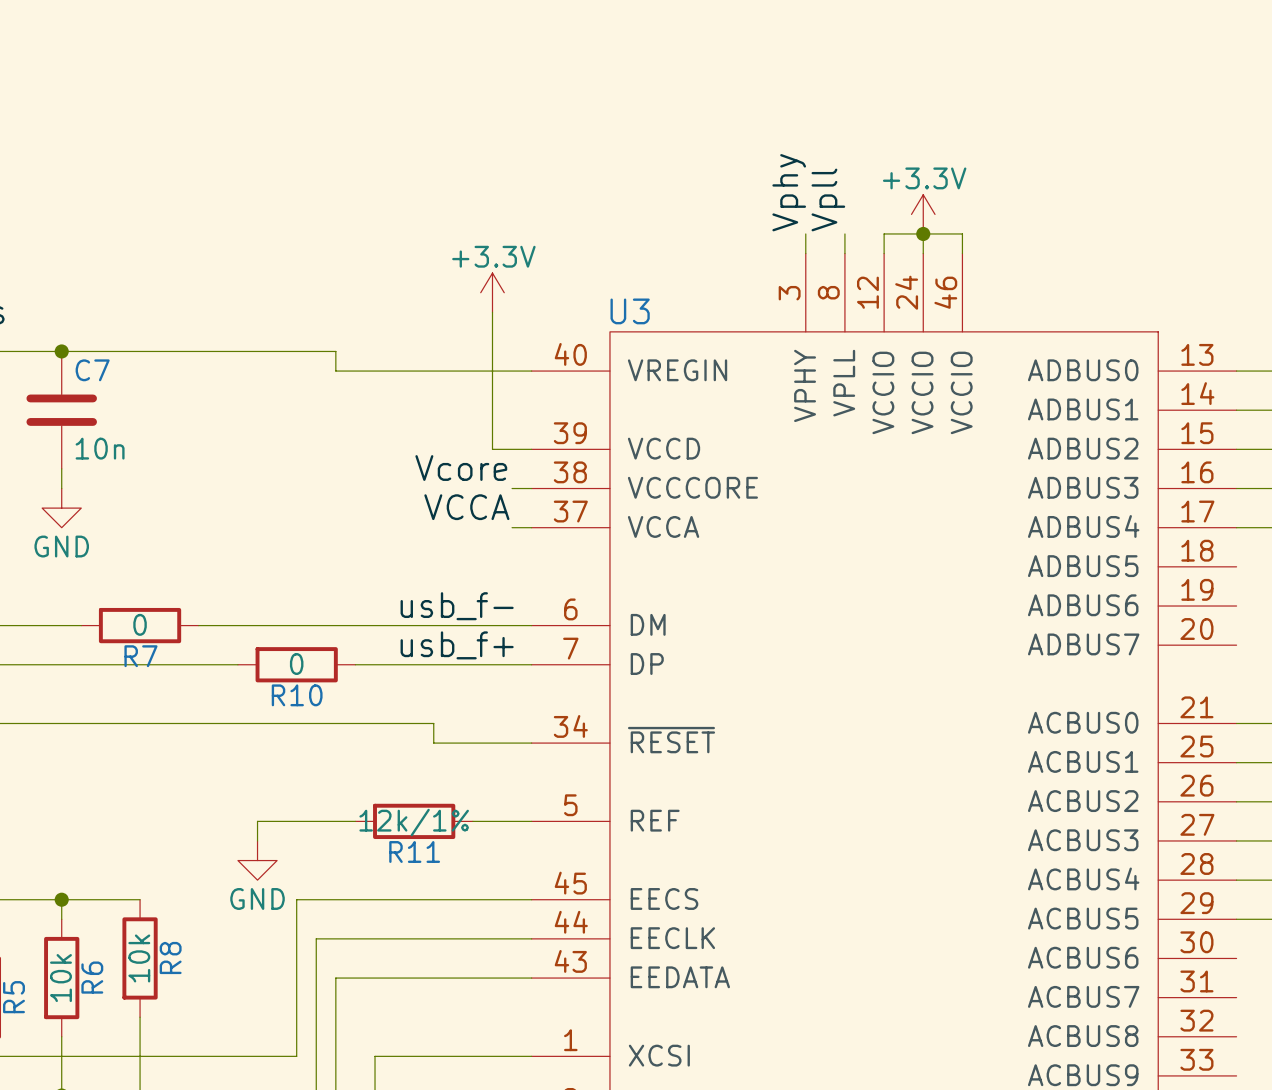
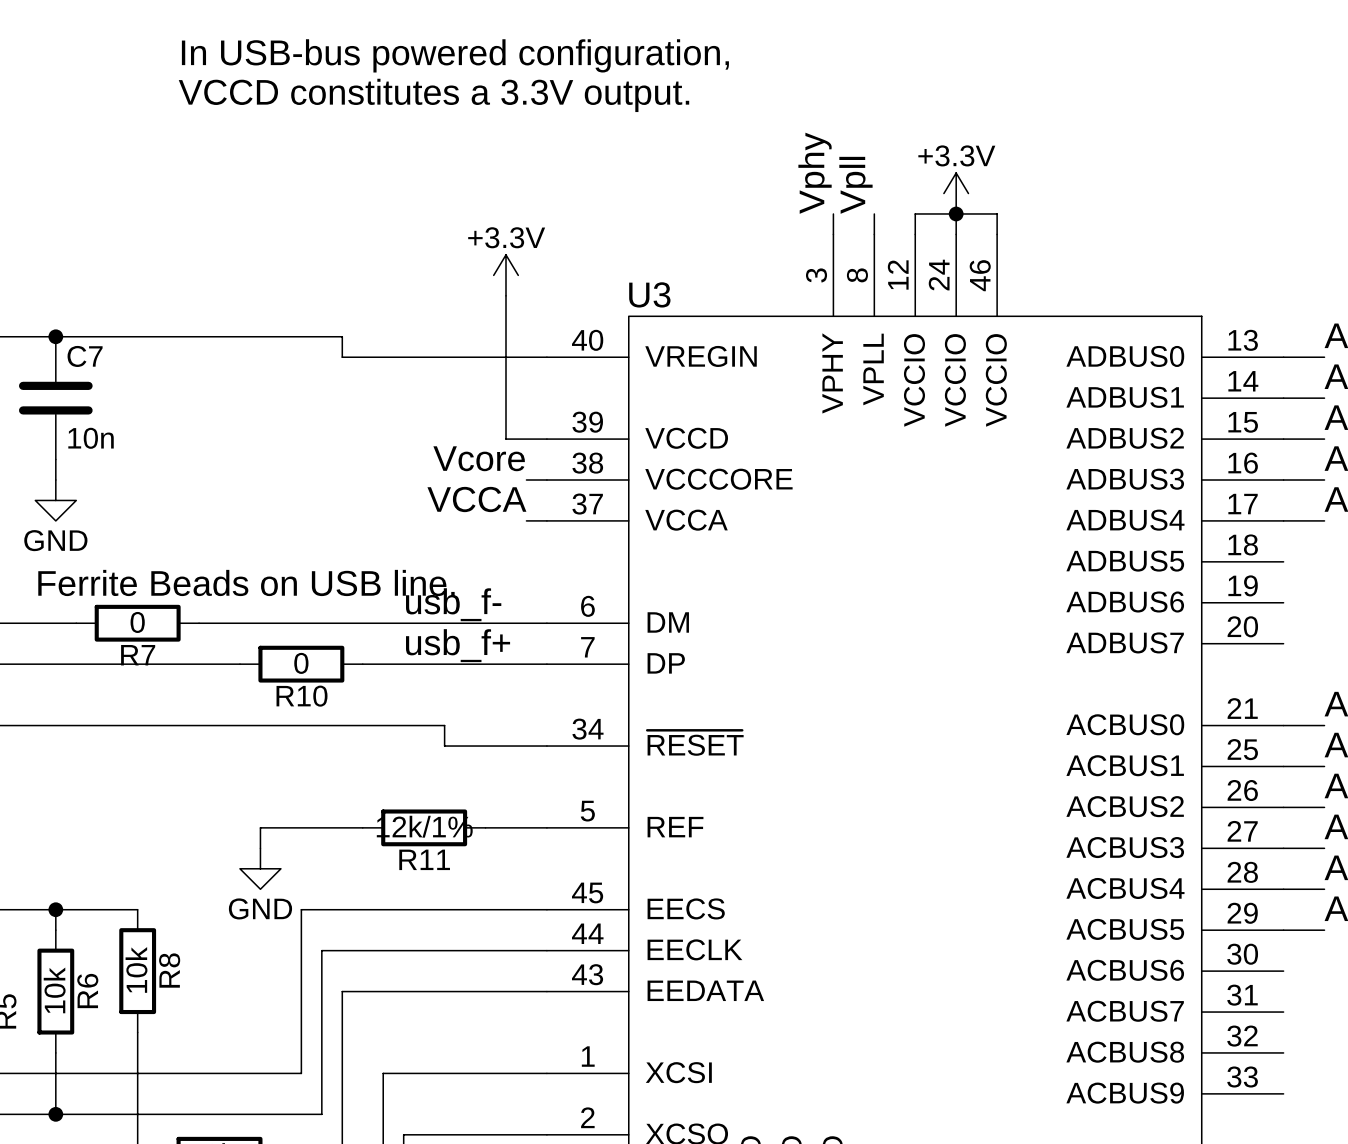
text: none -> In USB-bus powered configuration, (455, 55)
text: none -> VCCD constitutes a 3.3V output. (433, 95)
text: none -> Ferrite Beads on USB line. (246, 582)

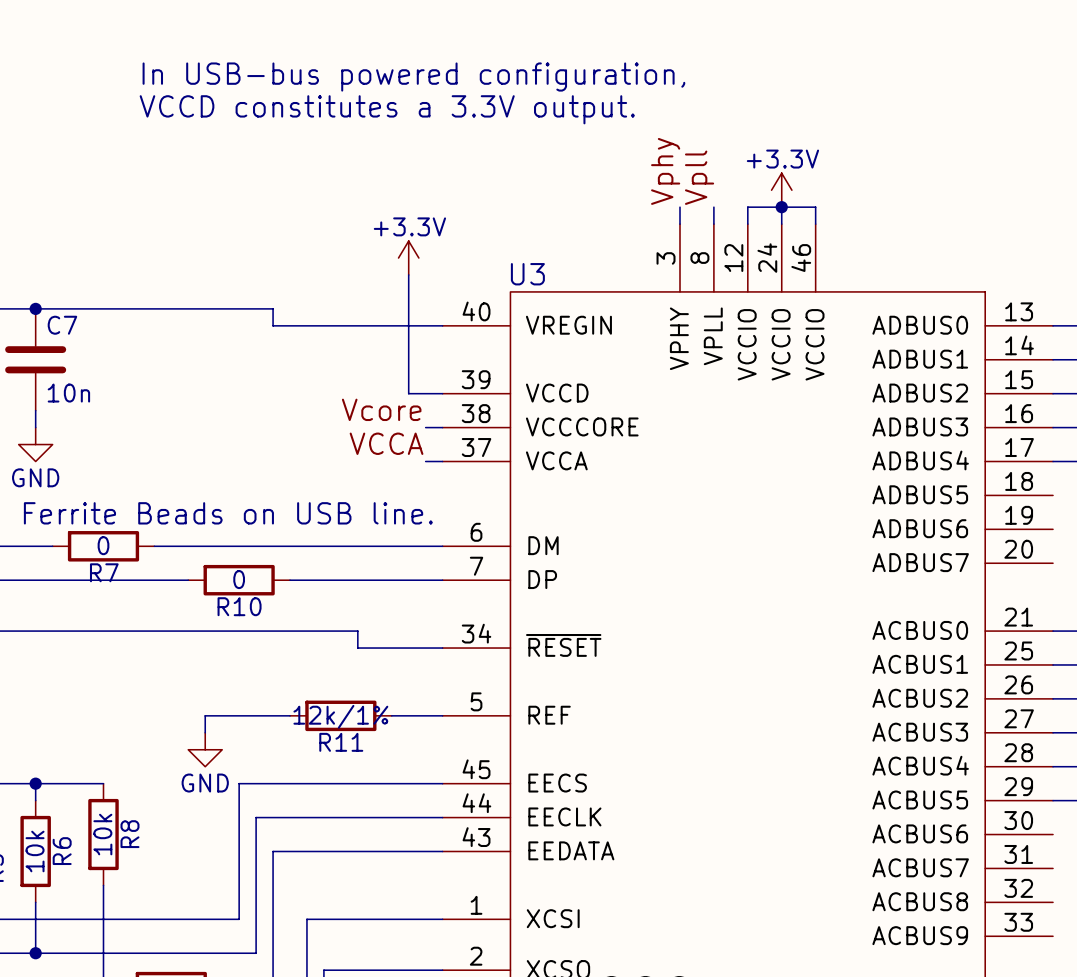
label: usb_f- (453, 604) -> none
label: usb_f+ (458, 645) -> none

